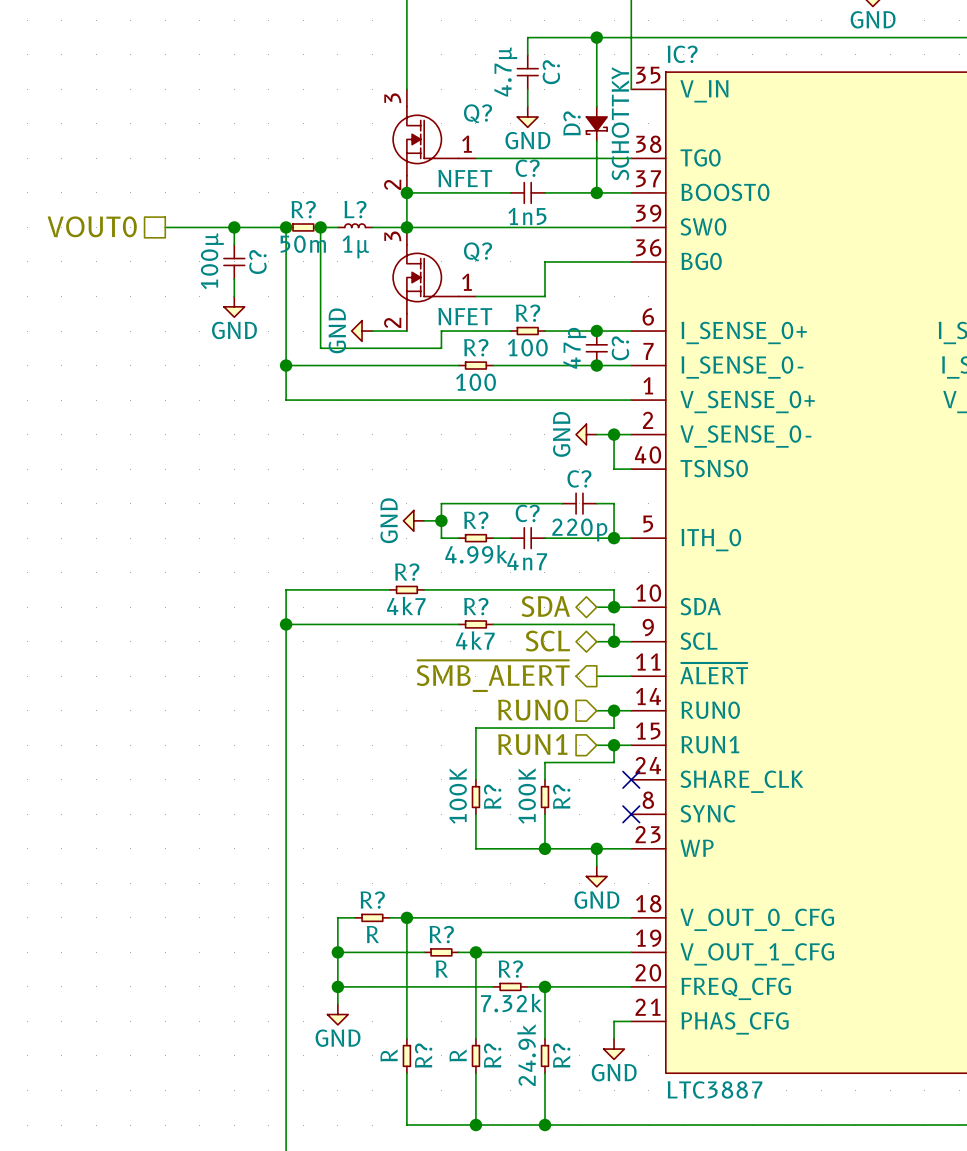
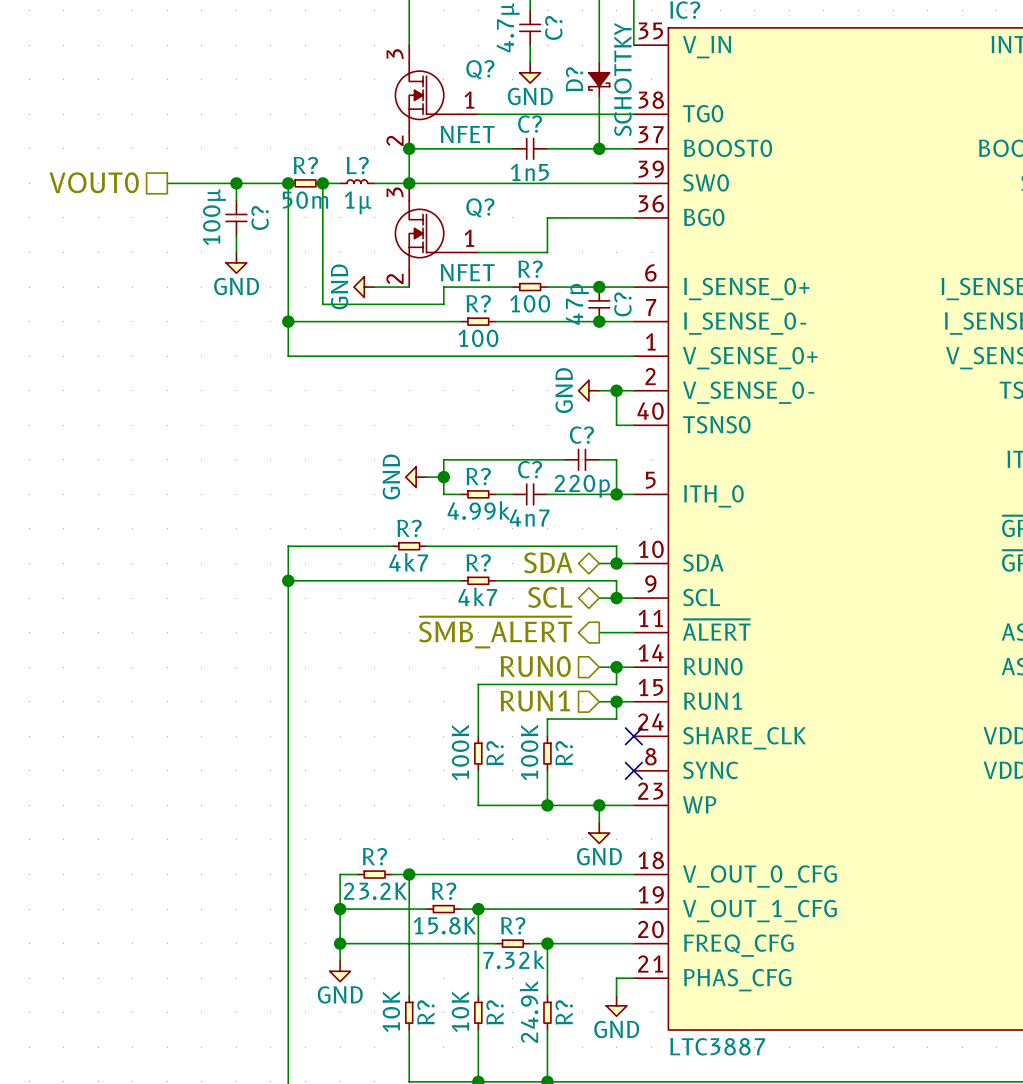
R? value: R (372, 934) -> 23.2K (375, 891)
R? value: R (441, 969) -> 15.8K (444, 925)
R? value: R (389, 1055) -> 10K (391, 1011)
R? value: R (458, 1055) -> 10K (460, 1011)

